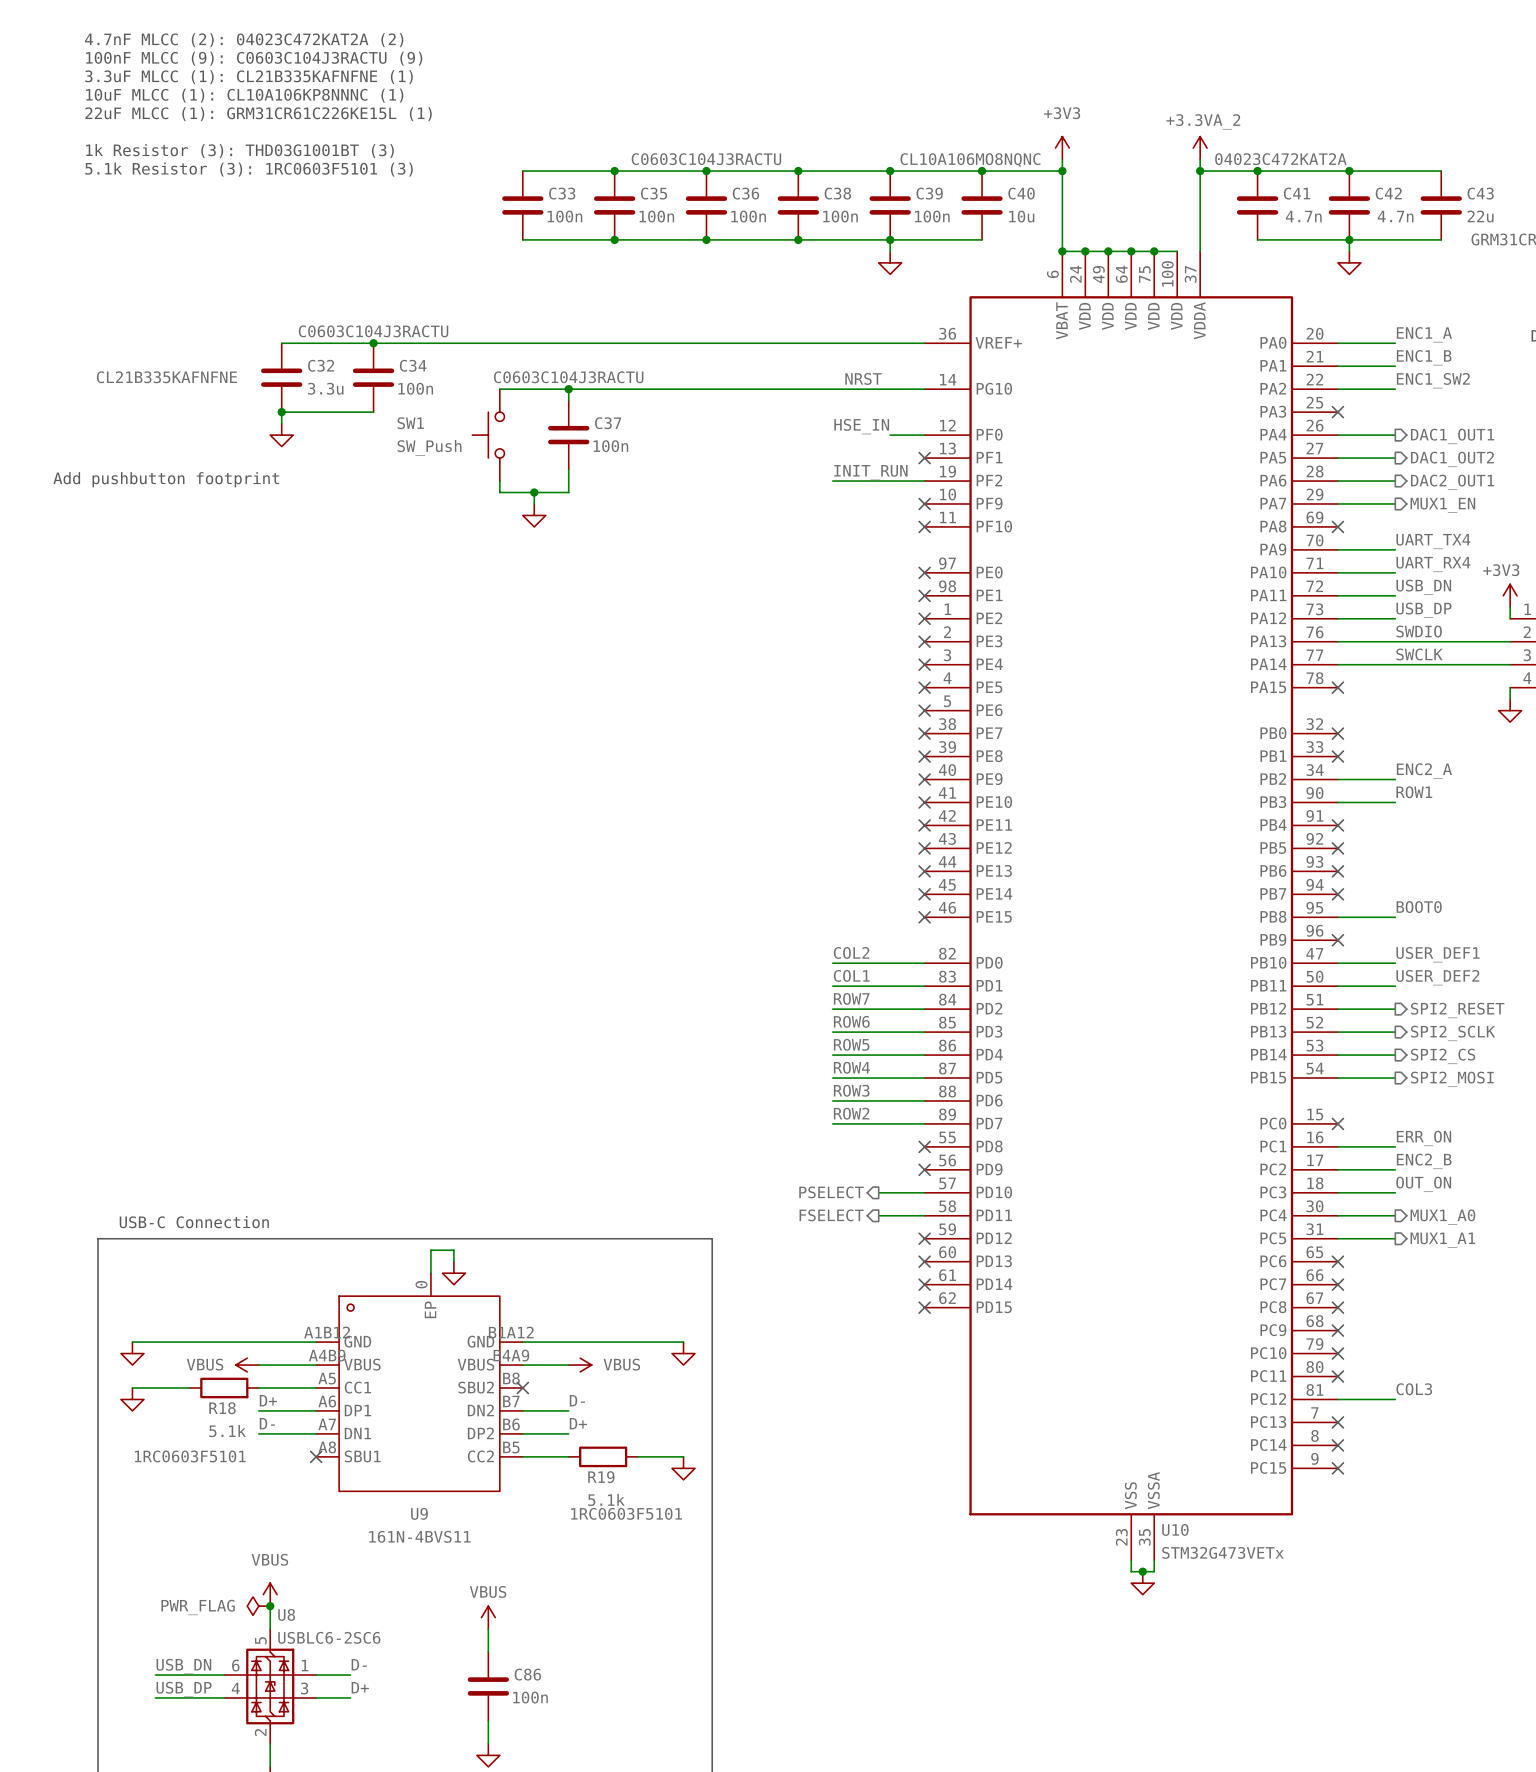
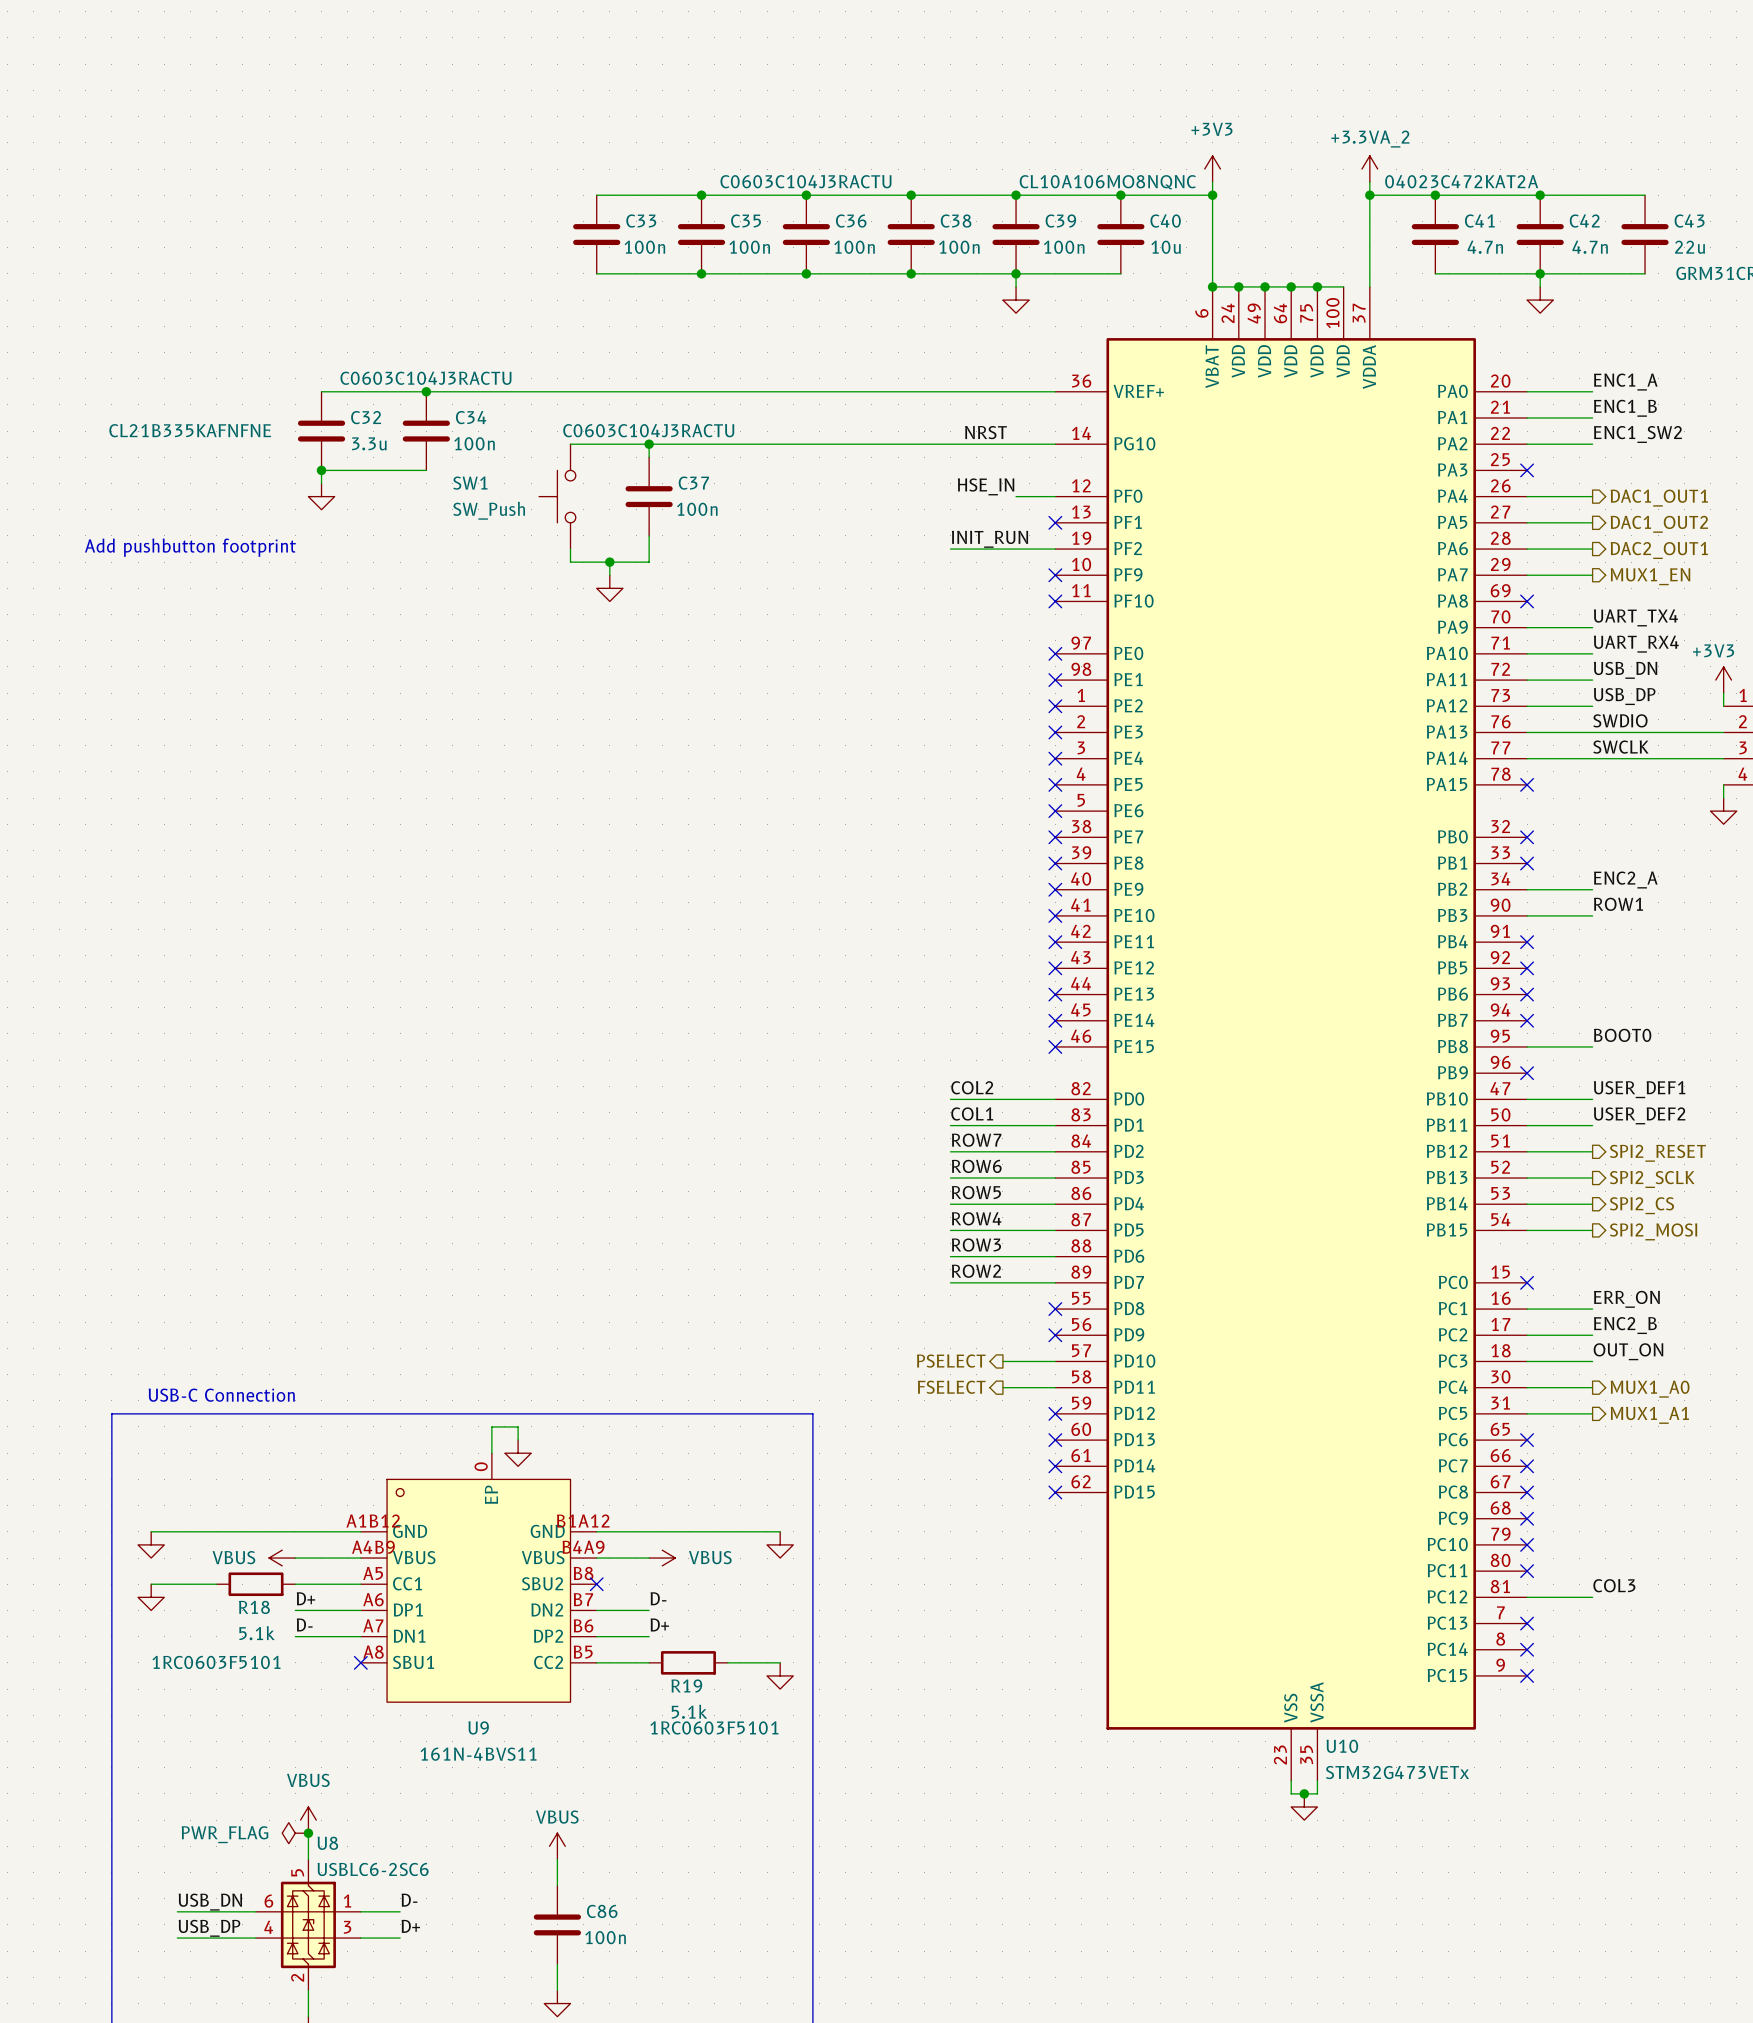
text: 4.7nF MLCC (2): 04023C472KAT2A (2) (244, 40) -> none
text: 100nF MLCC (9): C0603C104J3RACTU (9) (254, 58) -> none
text: 3.3uF MLCC (1): CL21B335KAFNFNE (1) (249, 77) -> none
text: 10uF MLCC (1): CL10A106KP8NNNC (1) (244, 95) -> none
text: 22uF MLCC (1): GRM31CR61C226KE15L (1) (258, 114) -> none
text: 1k Resistor (3): THD03G1001BT (3) (239, 151) -> none
text: 5.1k Resistor (3): 1RC0603F5101 (3) (249, 169) -> none

